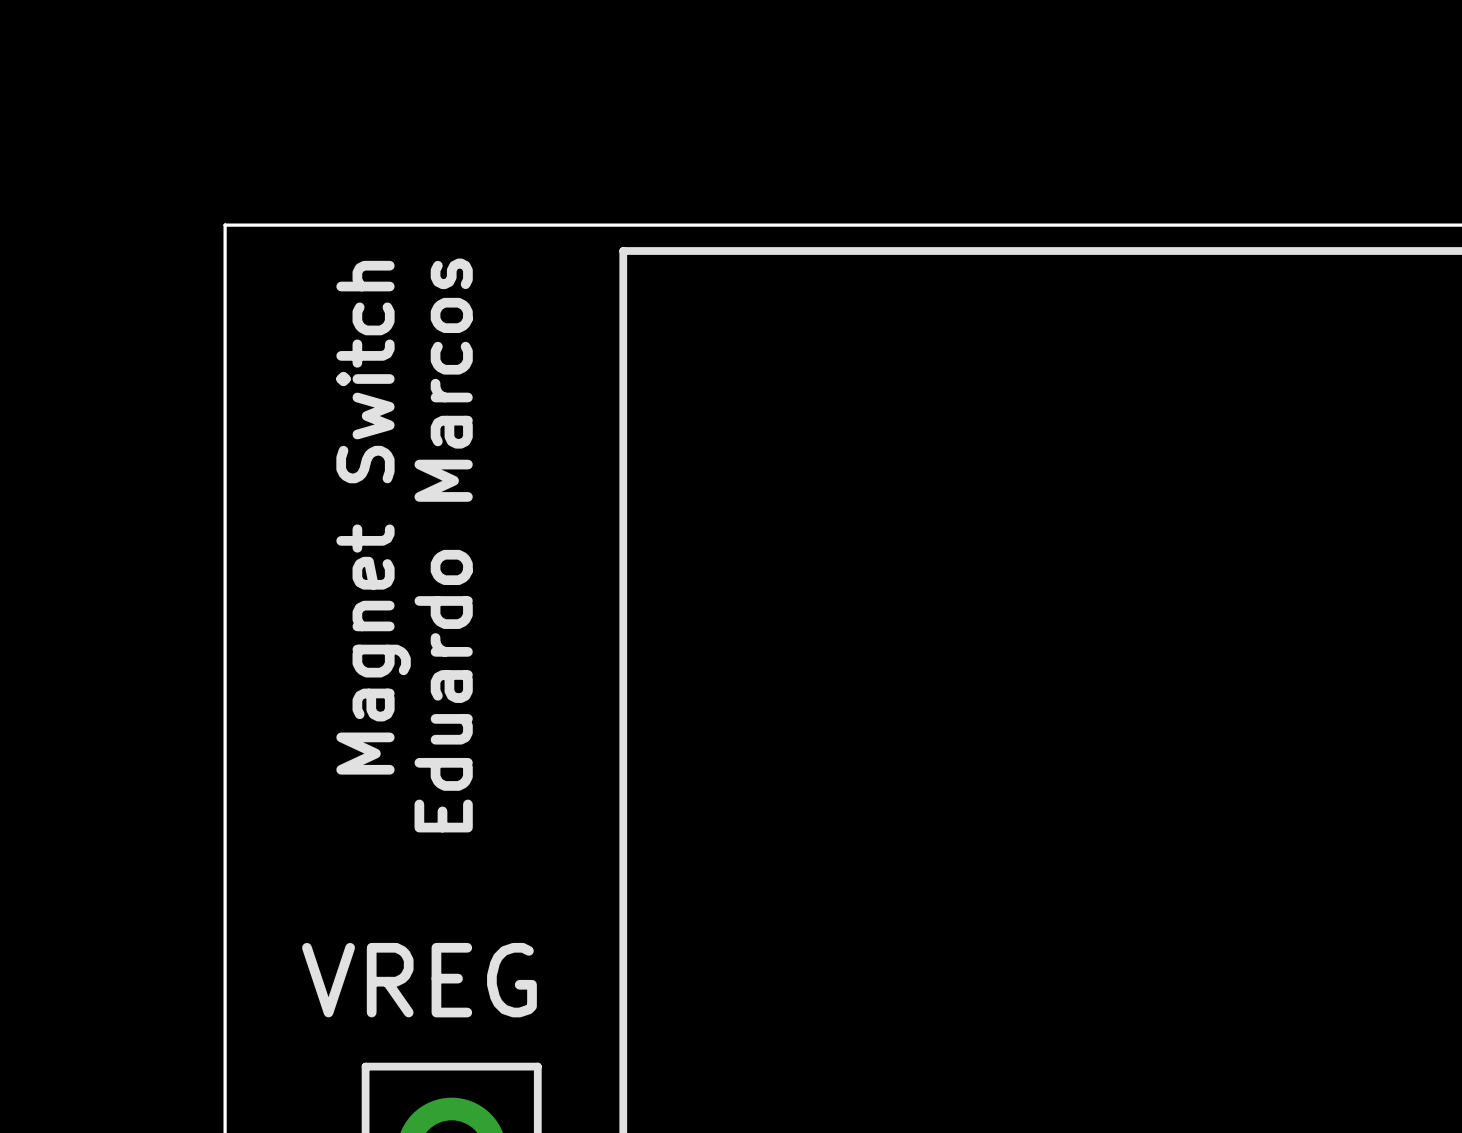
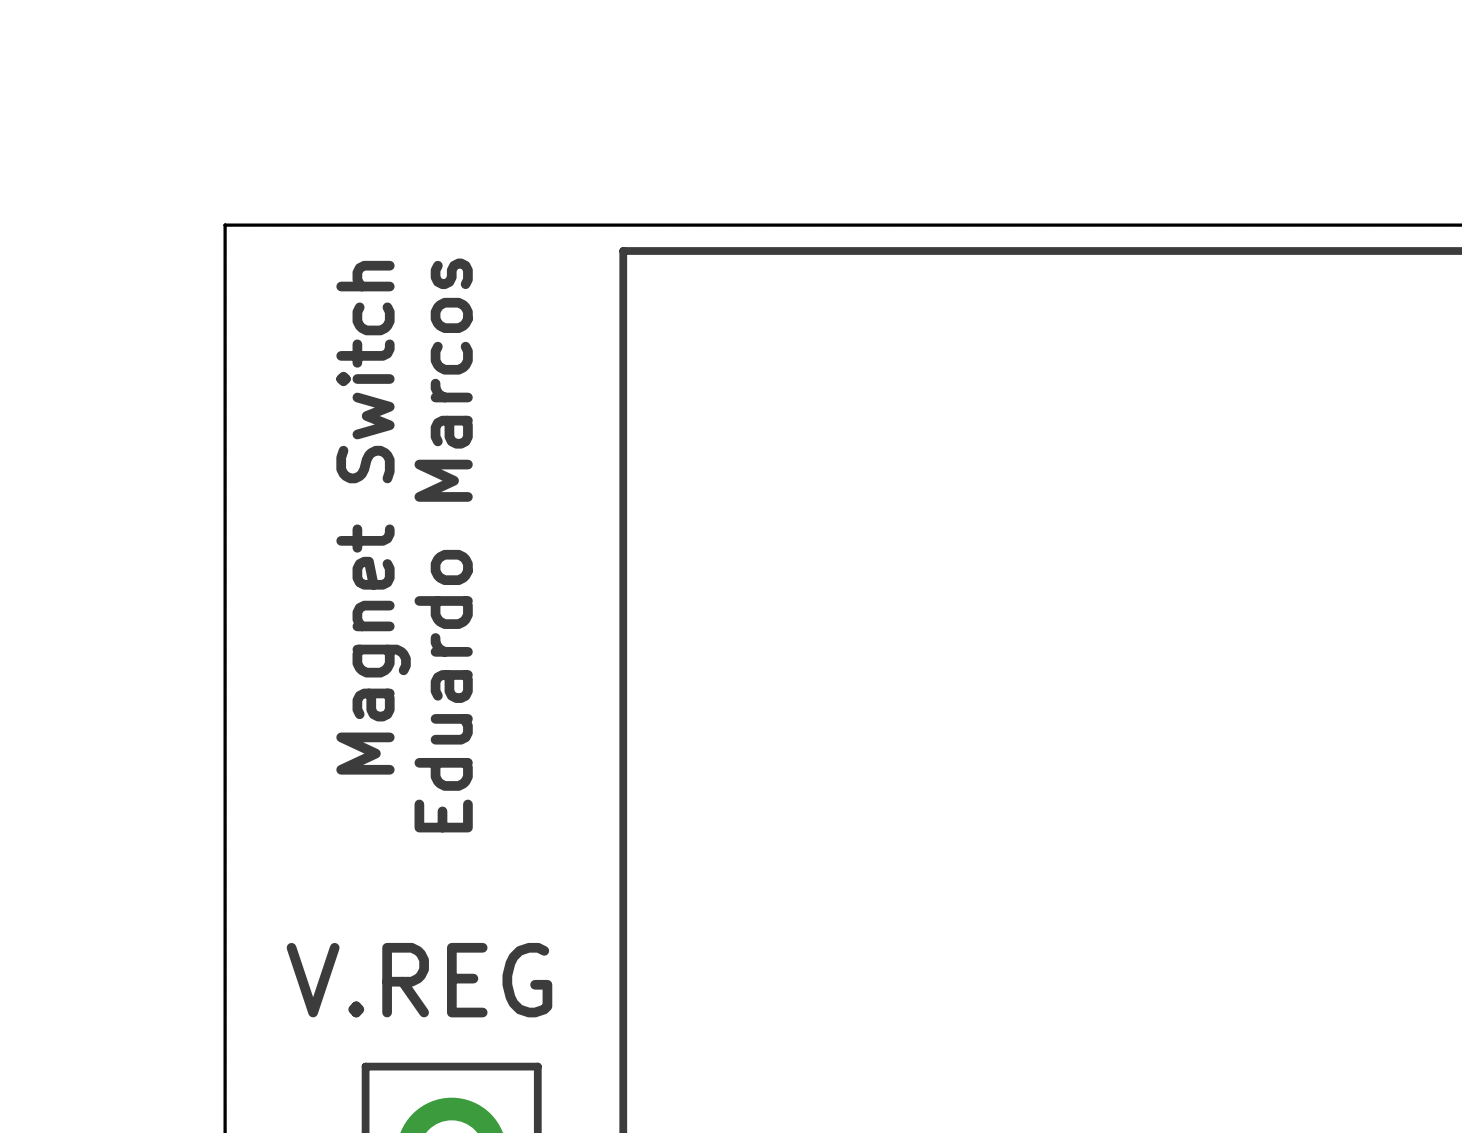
VREG name: VREG (419, 980) -> V.REG (419, 980)

